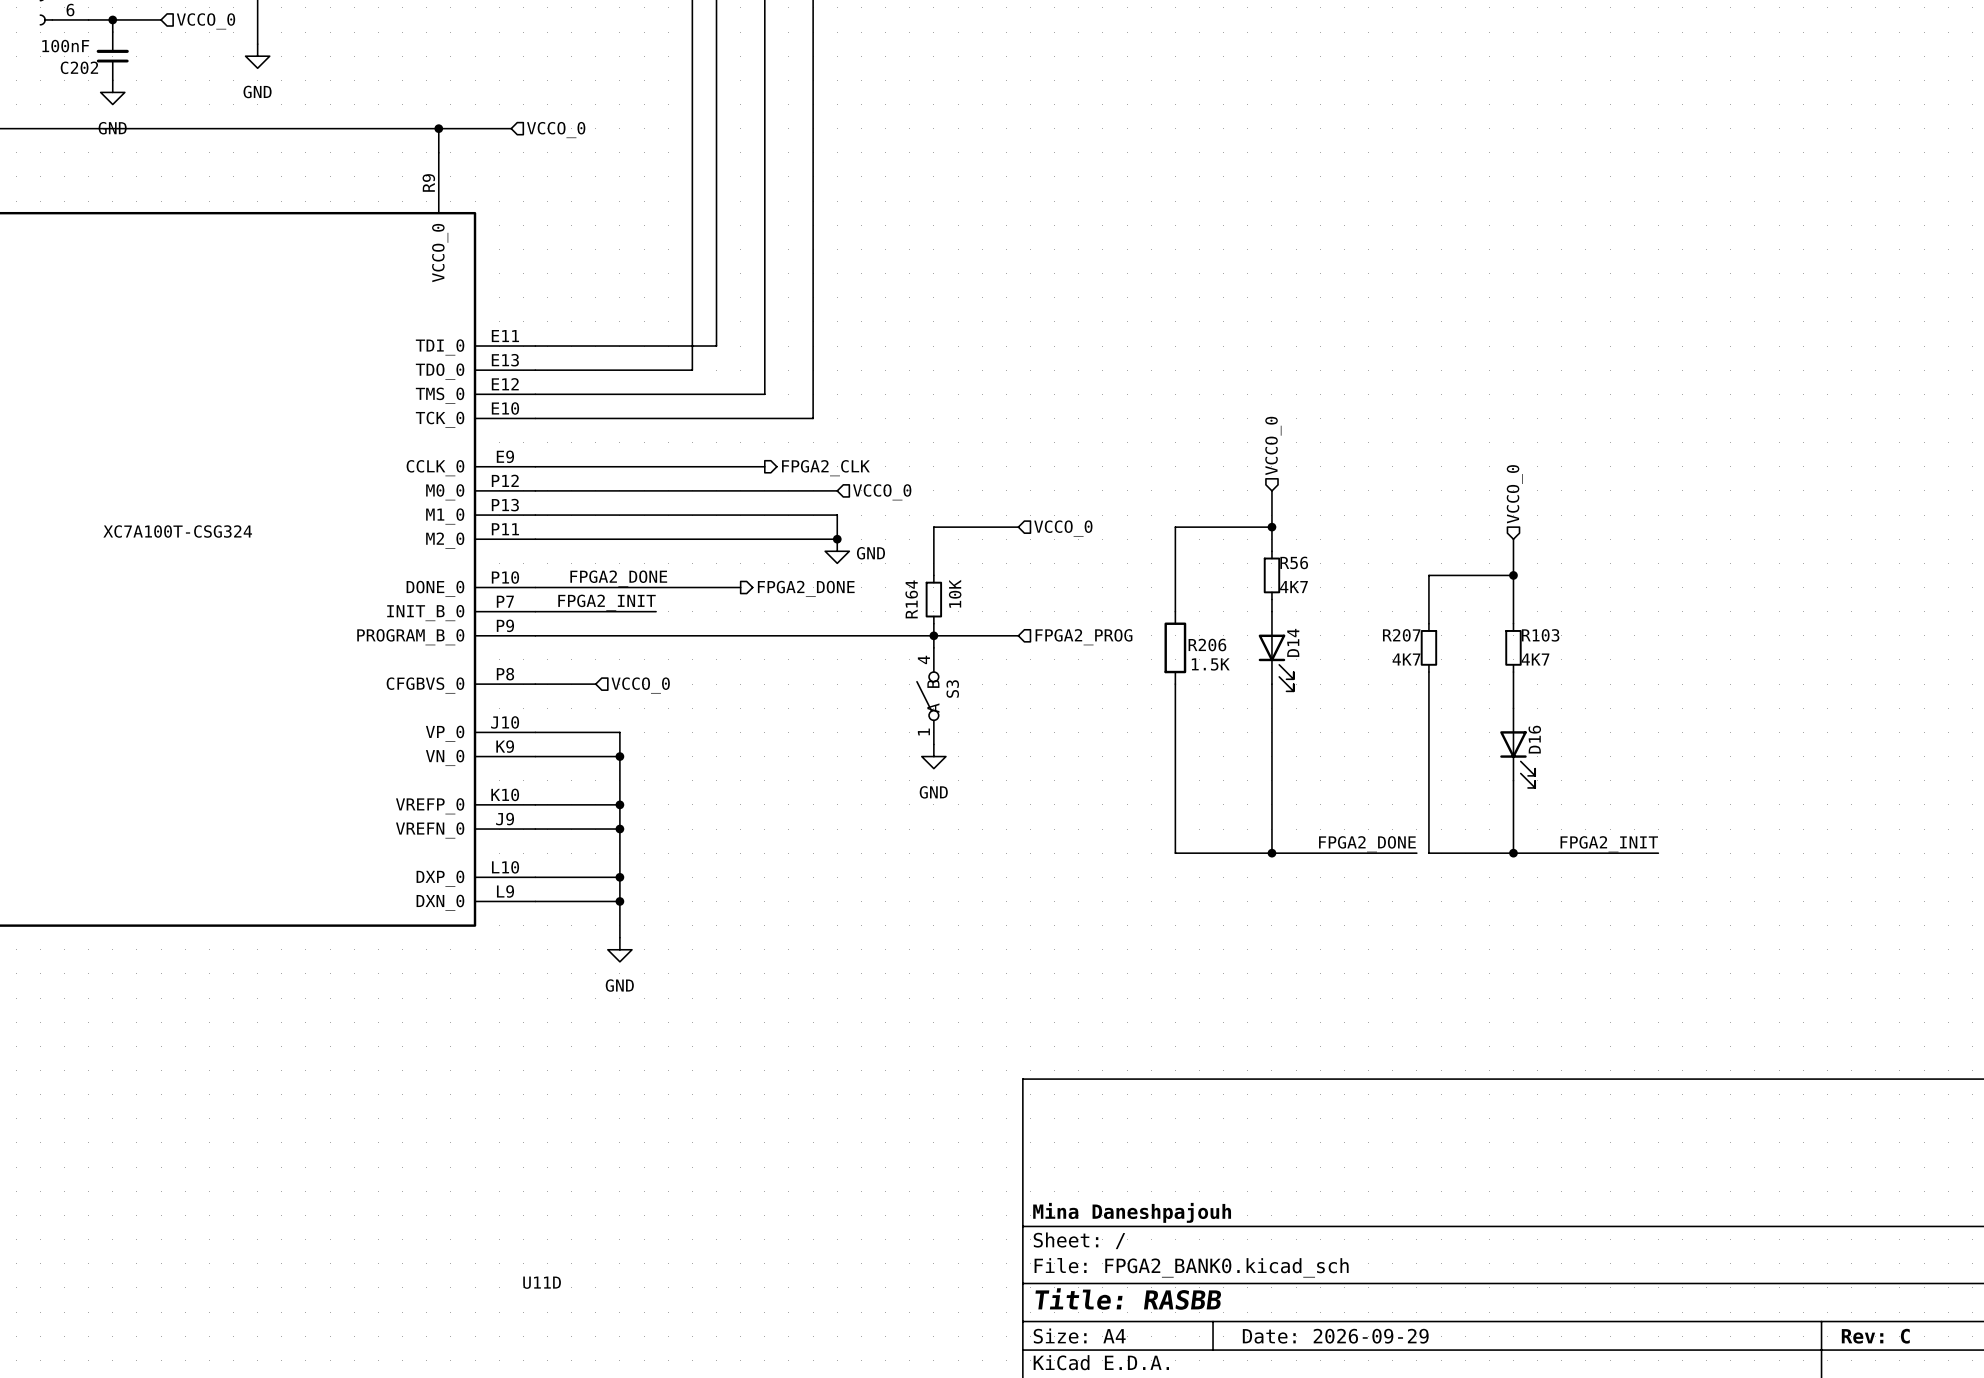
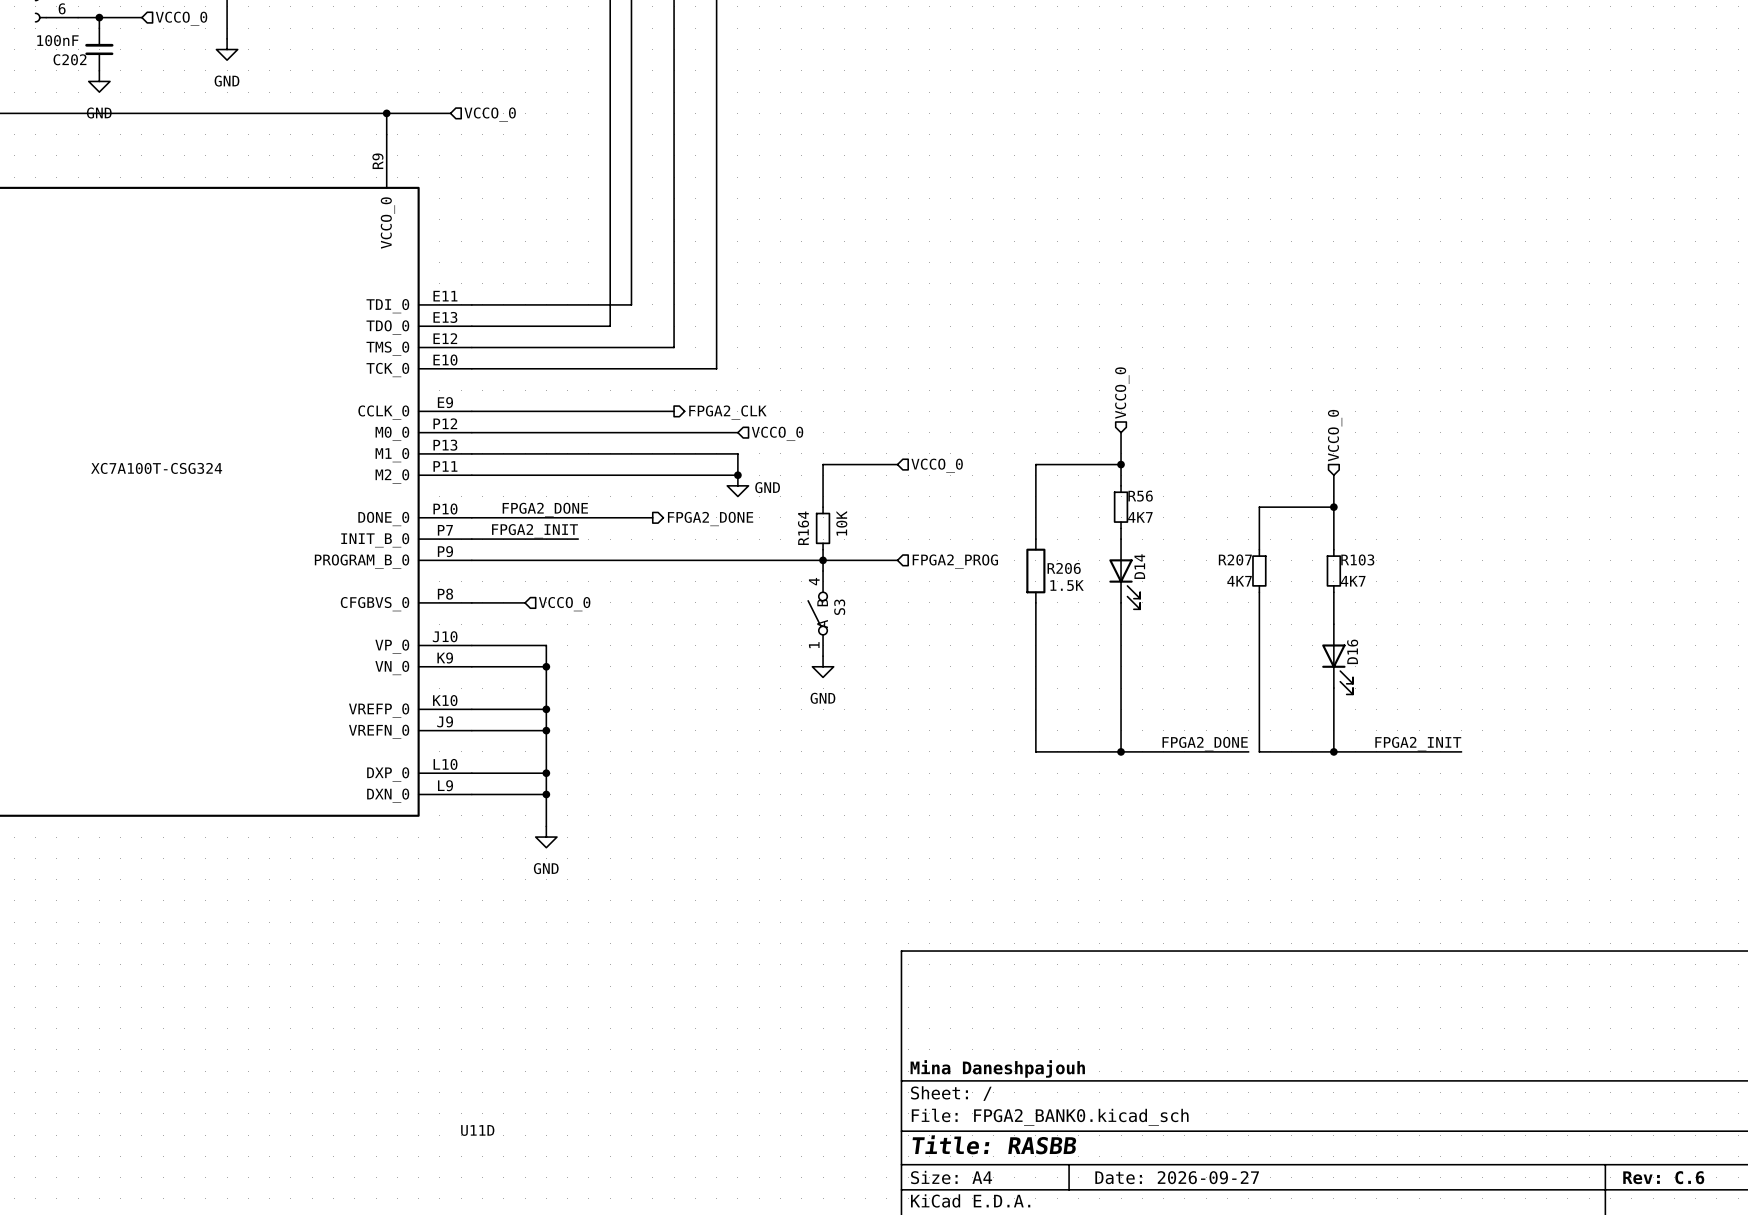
title block: Date: 2026-09-29 (1335, 1336) -> Date: 2026-09-27 (1177, 1177)
title block: Rev: C (1875, 1336) -> Rev: C.6 (1663, 1177)

